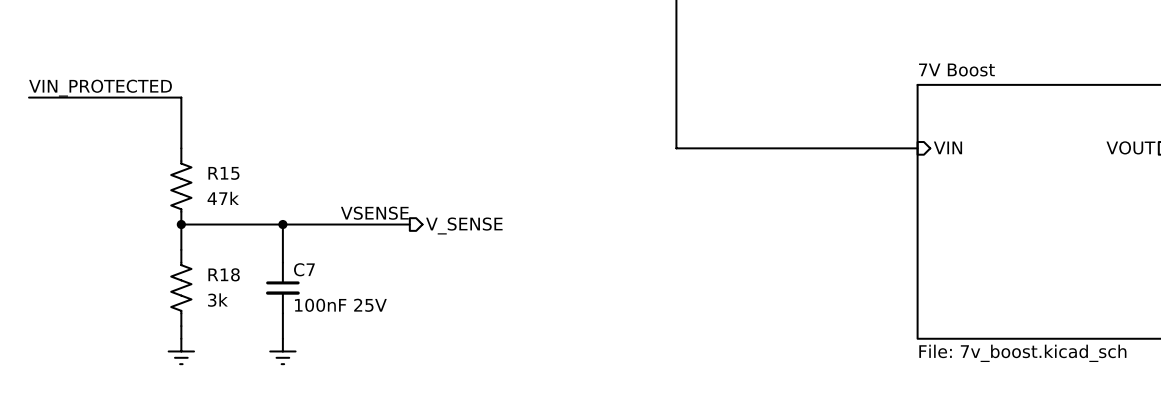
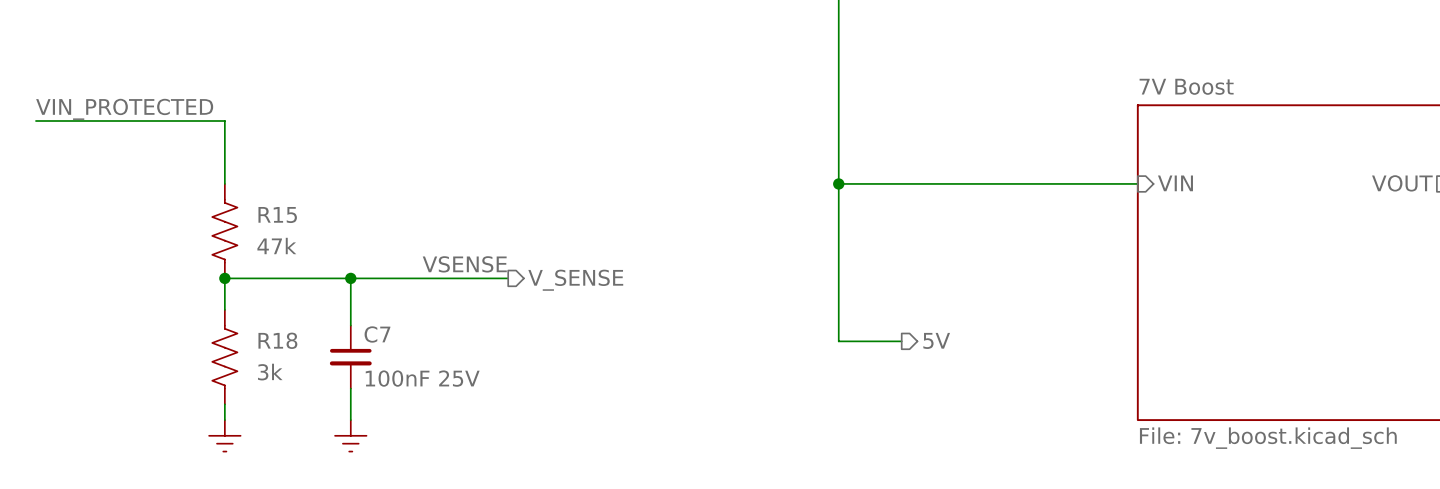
wire: none -> (838, 183) (838, 341) (901, 341)
junction: none -> (838, 183)
hierarchical label: none -> 5V (936, 340)

